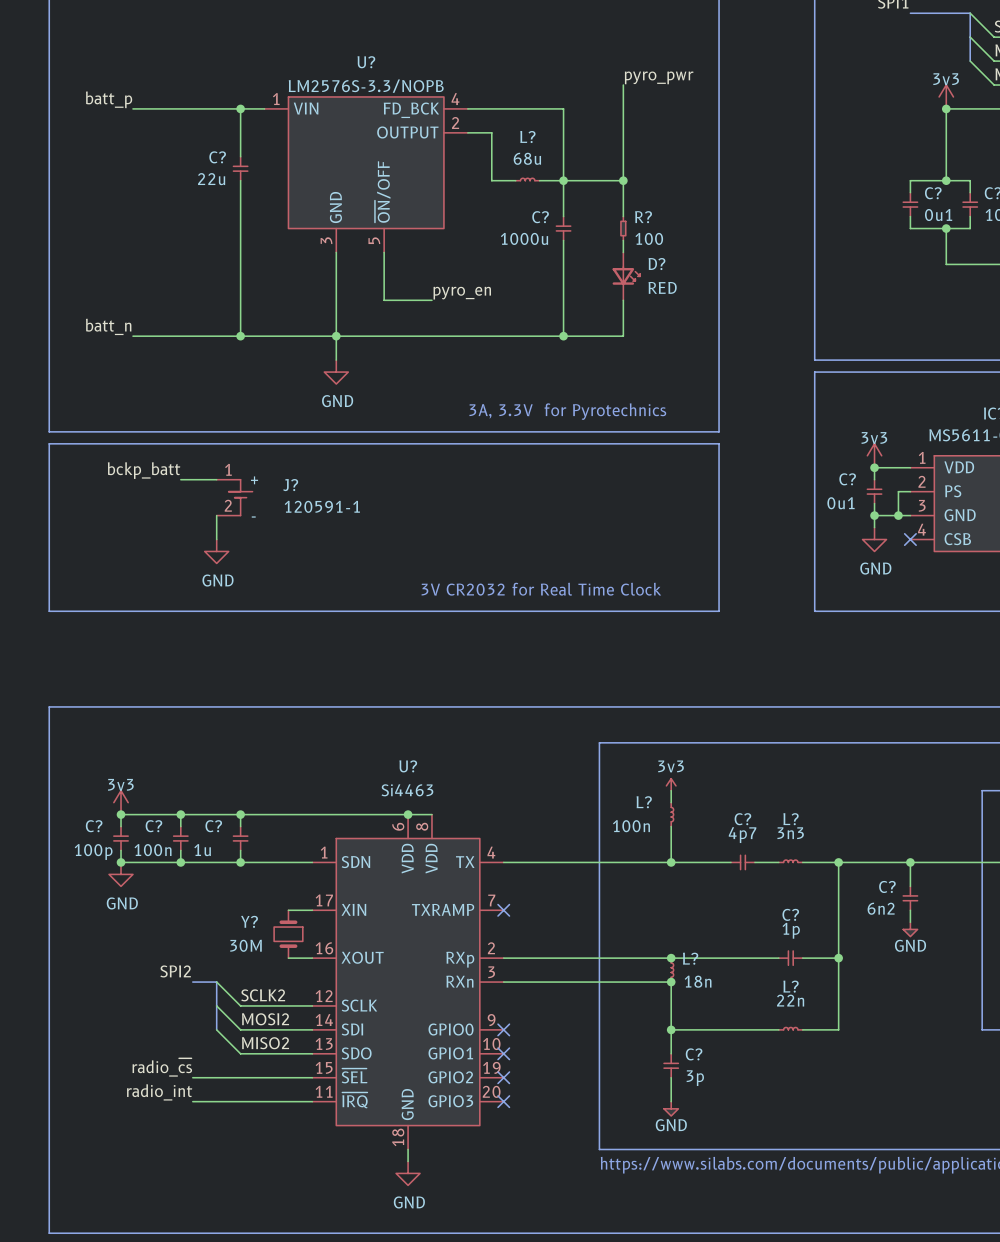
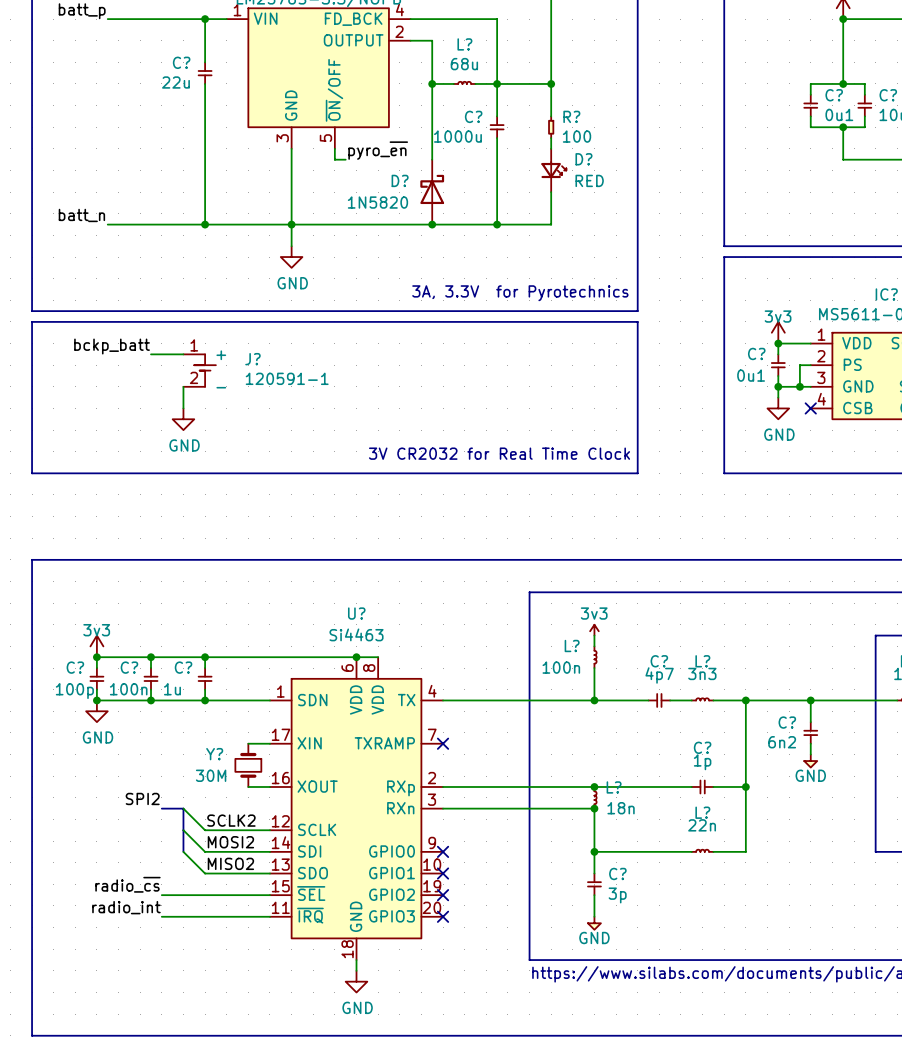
wire: none -> (432, 83) (432, 159)
junction: none -> (432, 83)
label: none -> pyro_~{en} (378, 150)
wire: (384, 264) (384, 300) (431, 300) -> (334, 159) (345, 159)
label: pyro_en (462, 293) -> none
D?: none -> 1N5820 (432, 192)
junction: none -> (432, 224)

